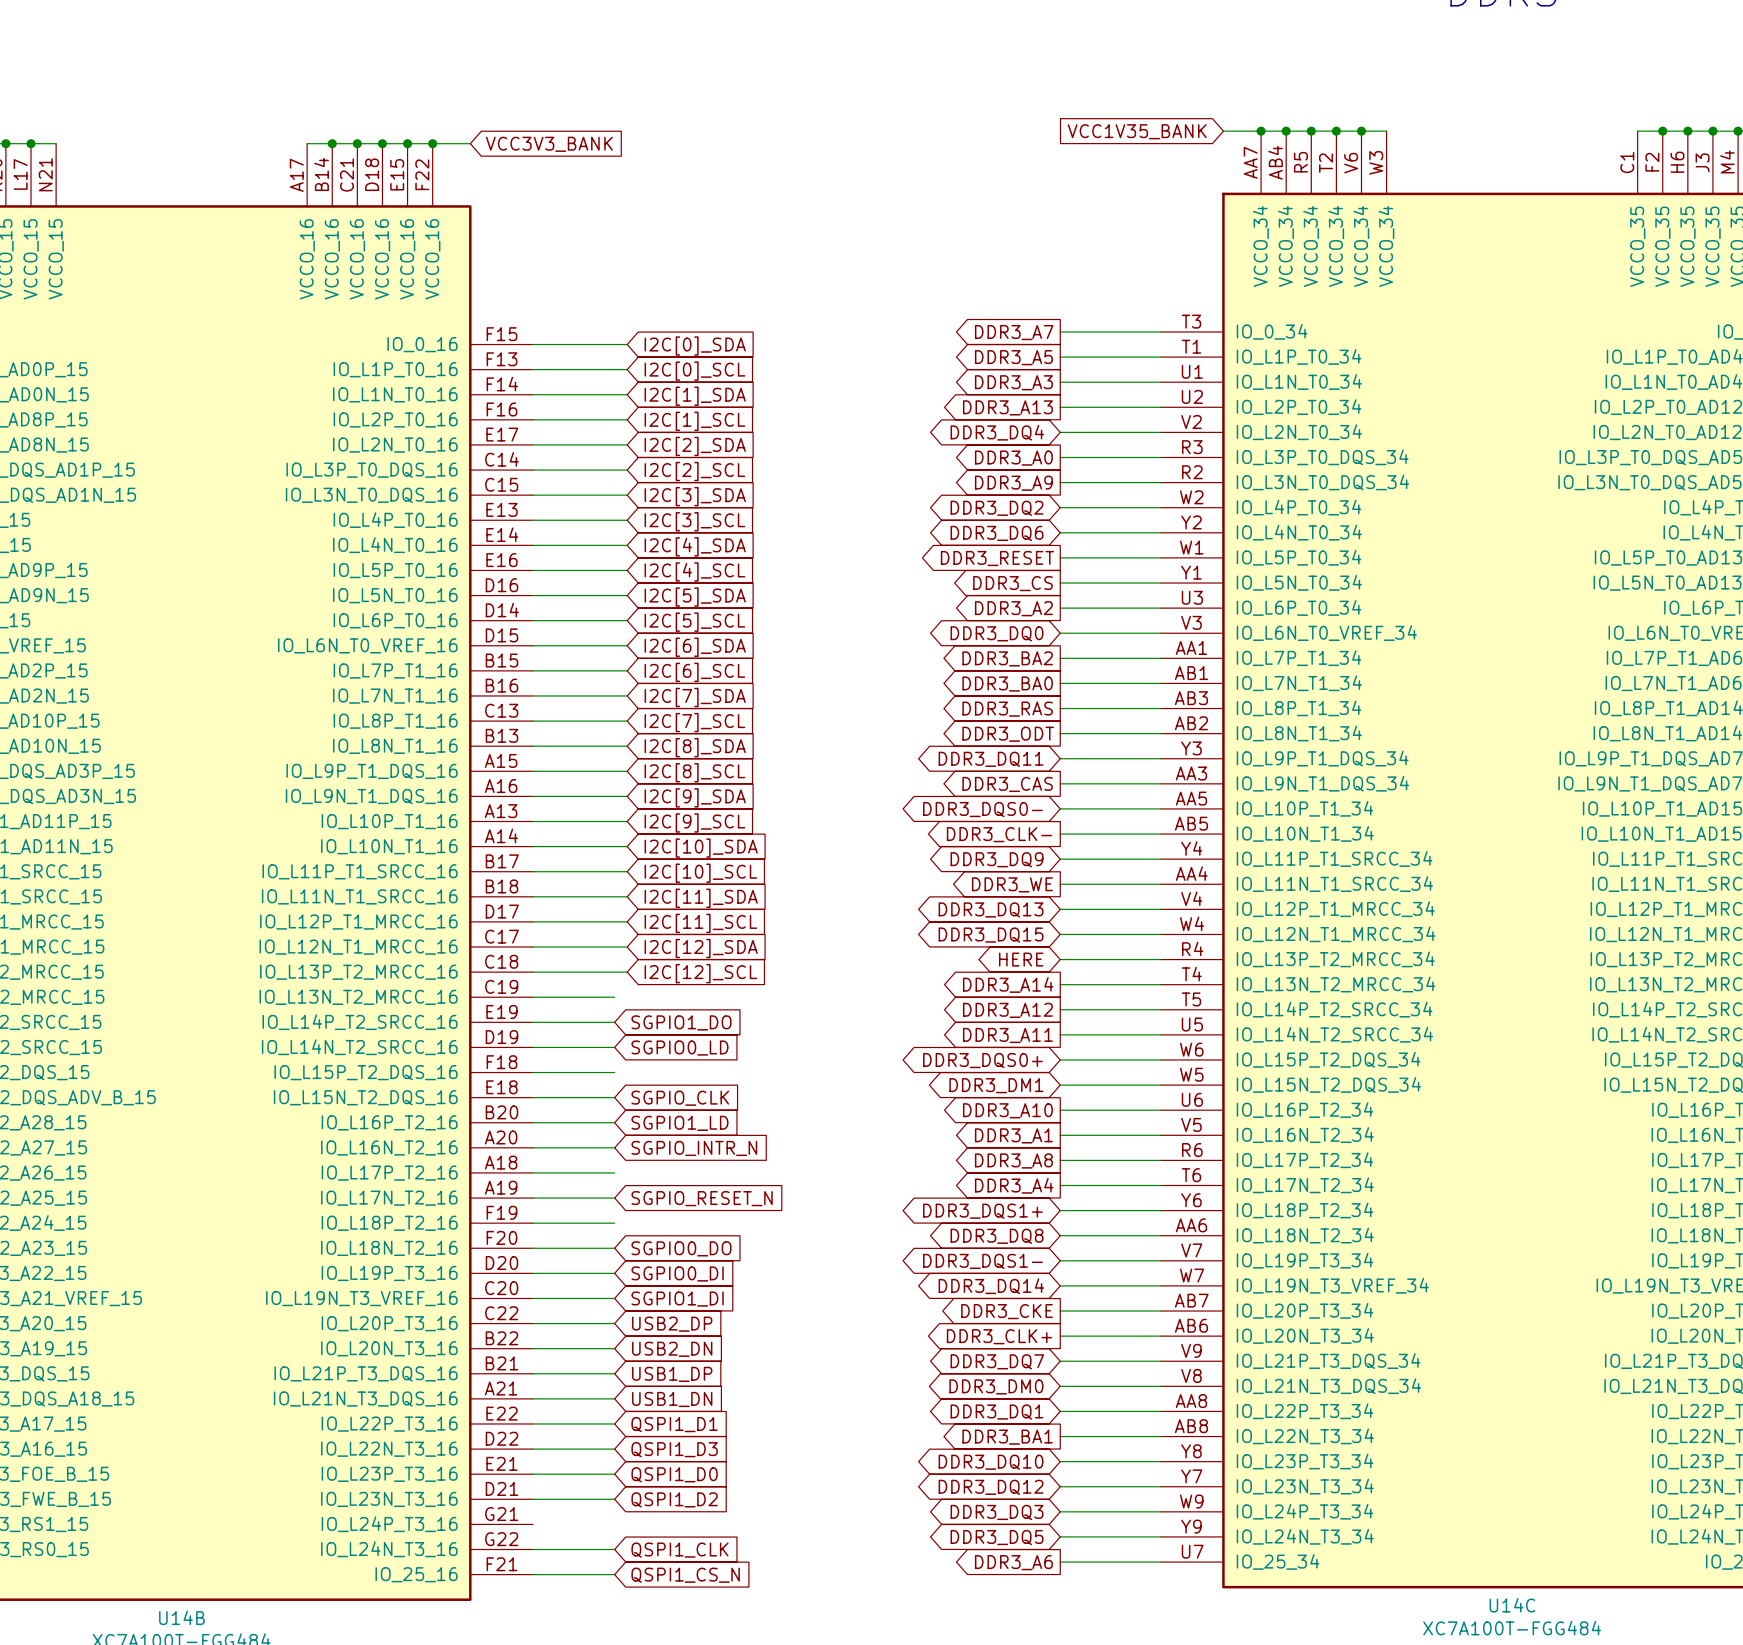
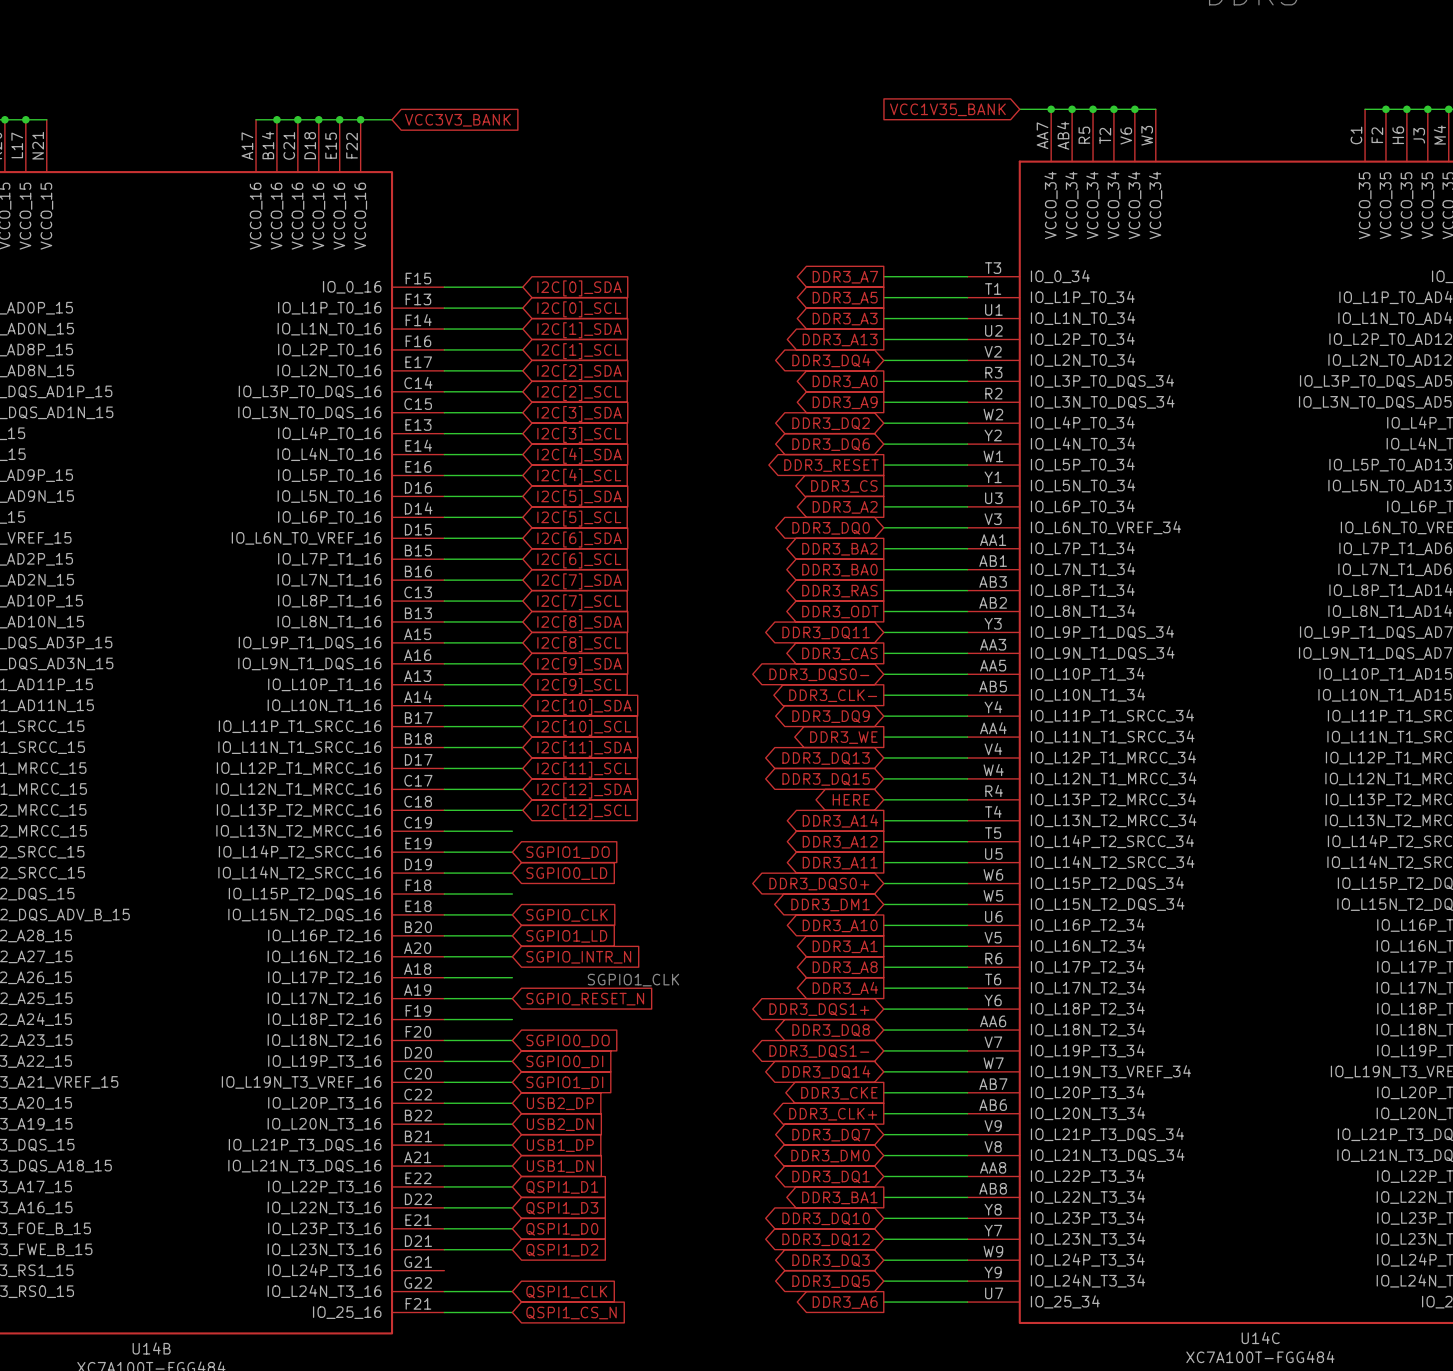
text: none -> SGPIO1_CLK (633, 980)

